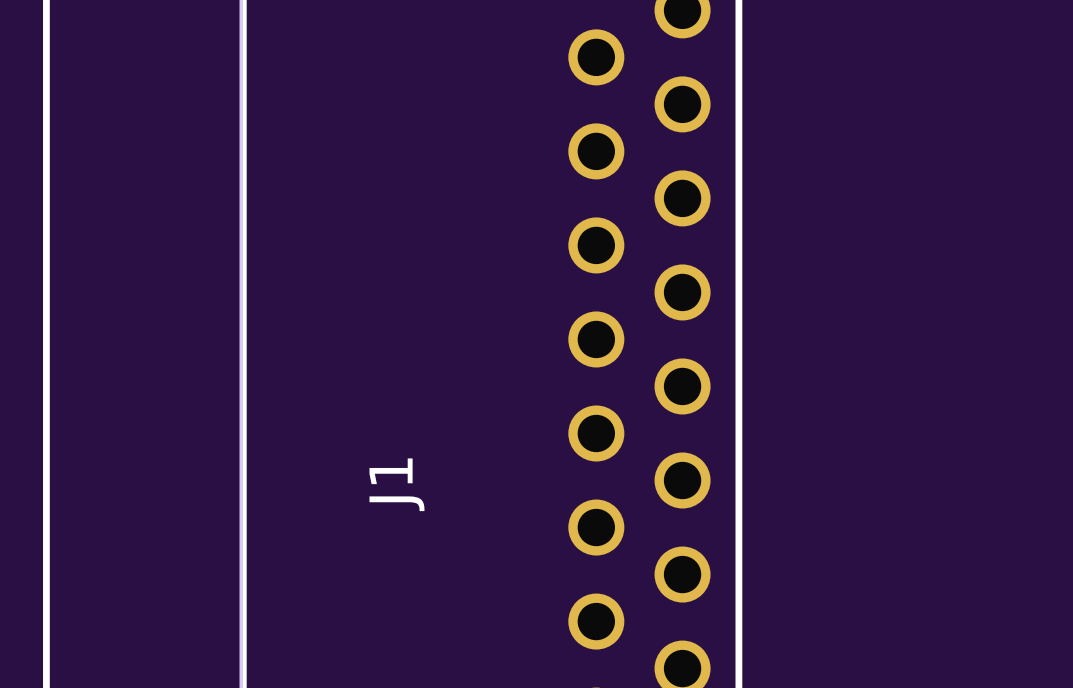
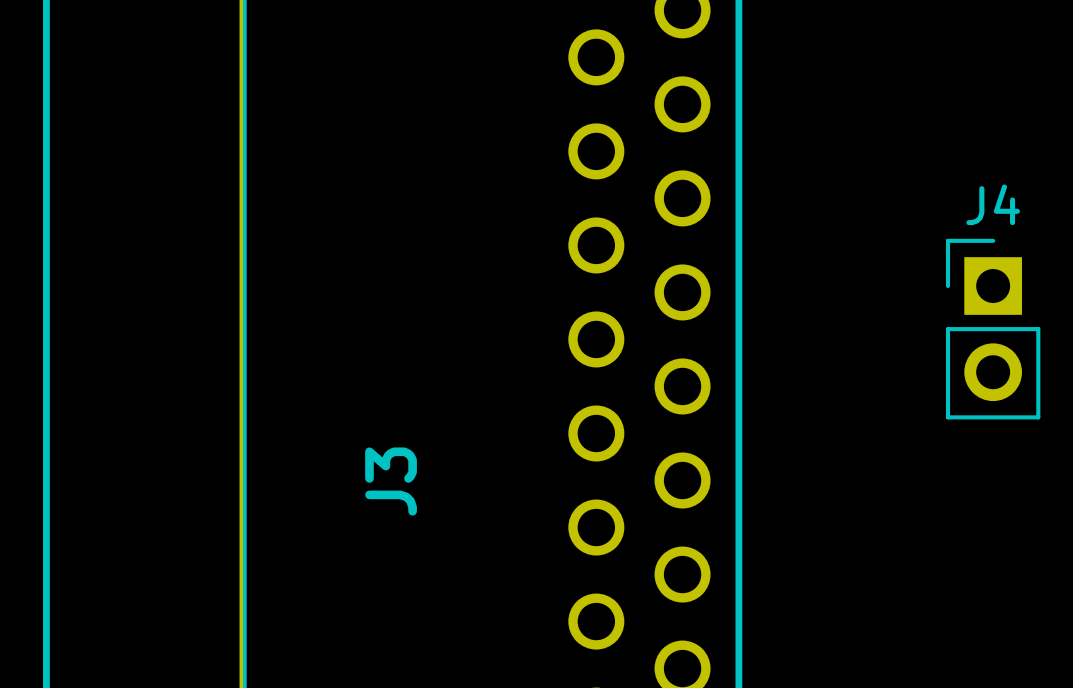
J4: none -> (993, 329)
J1 name: J1 (396, 484) -> J3 (391, 481)

